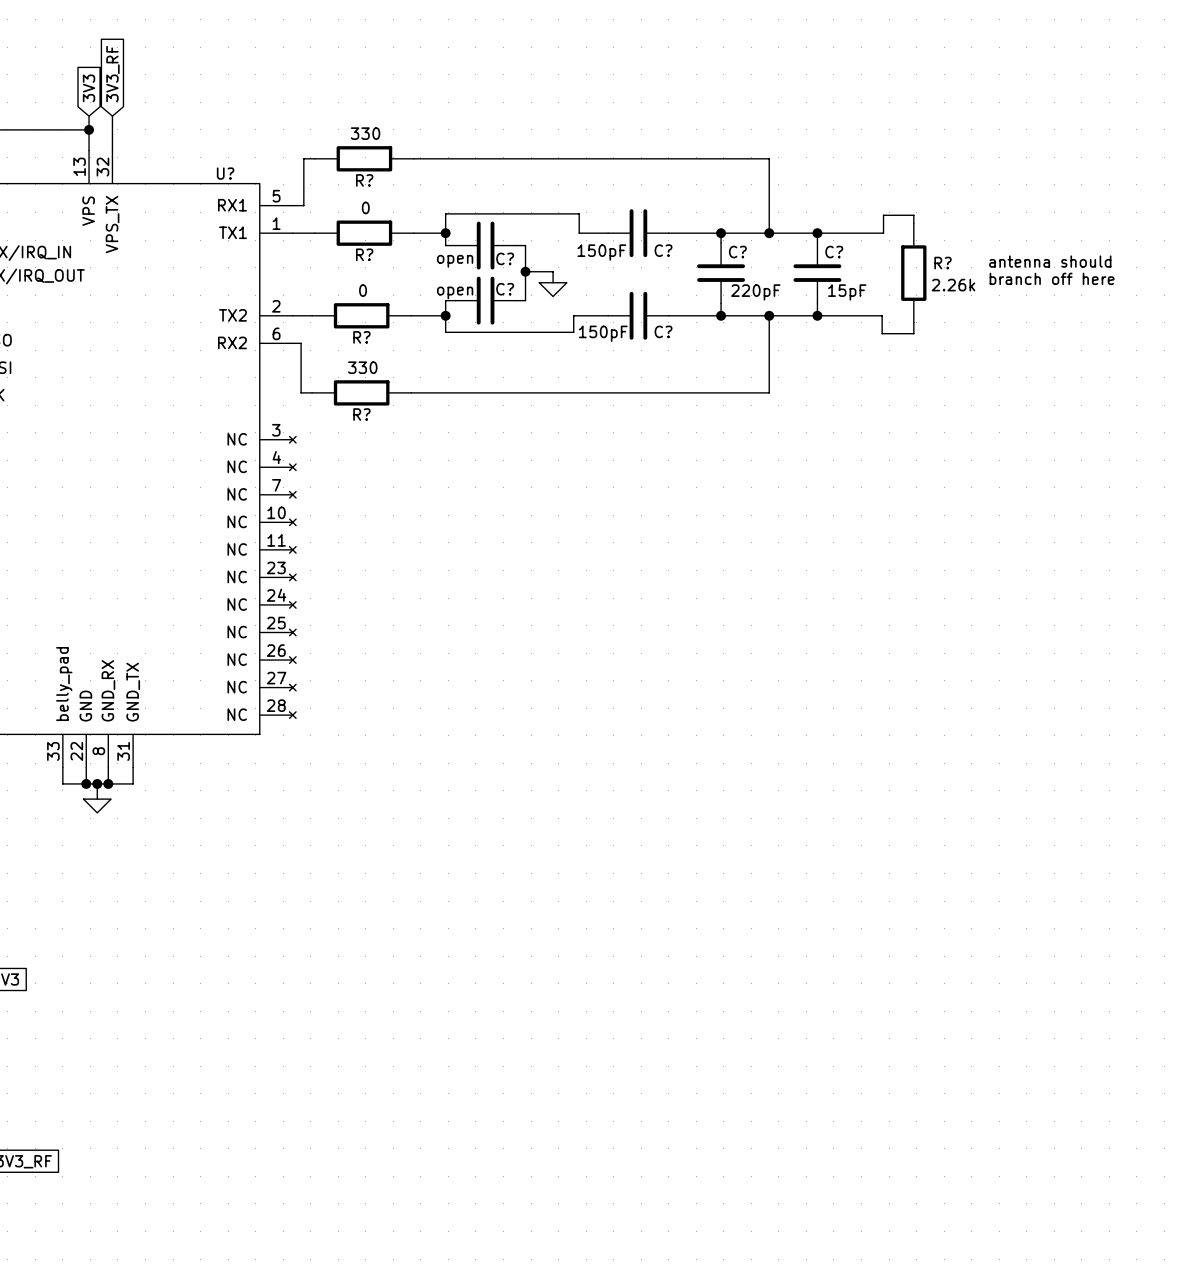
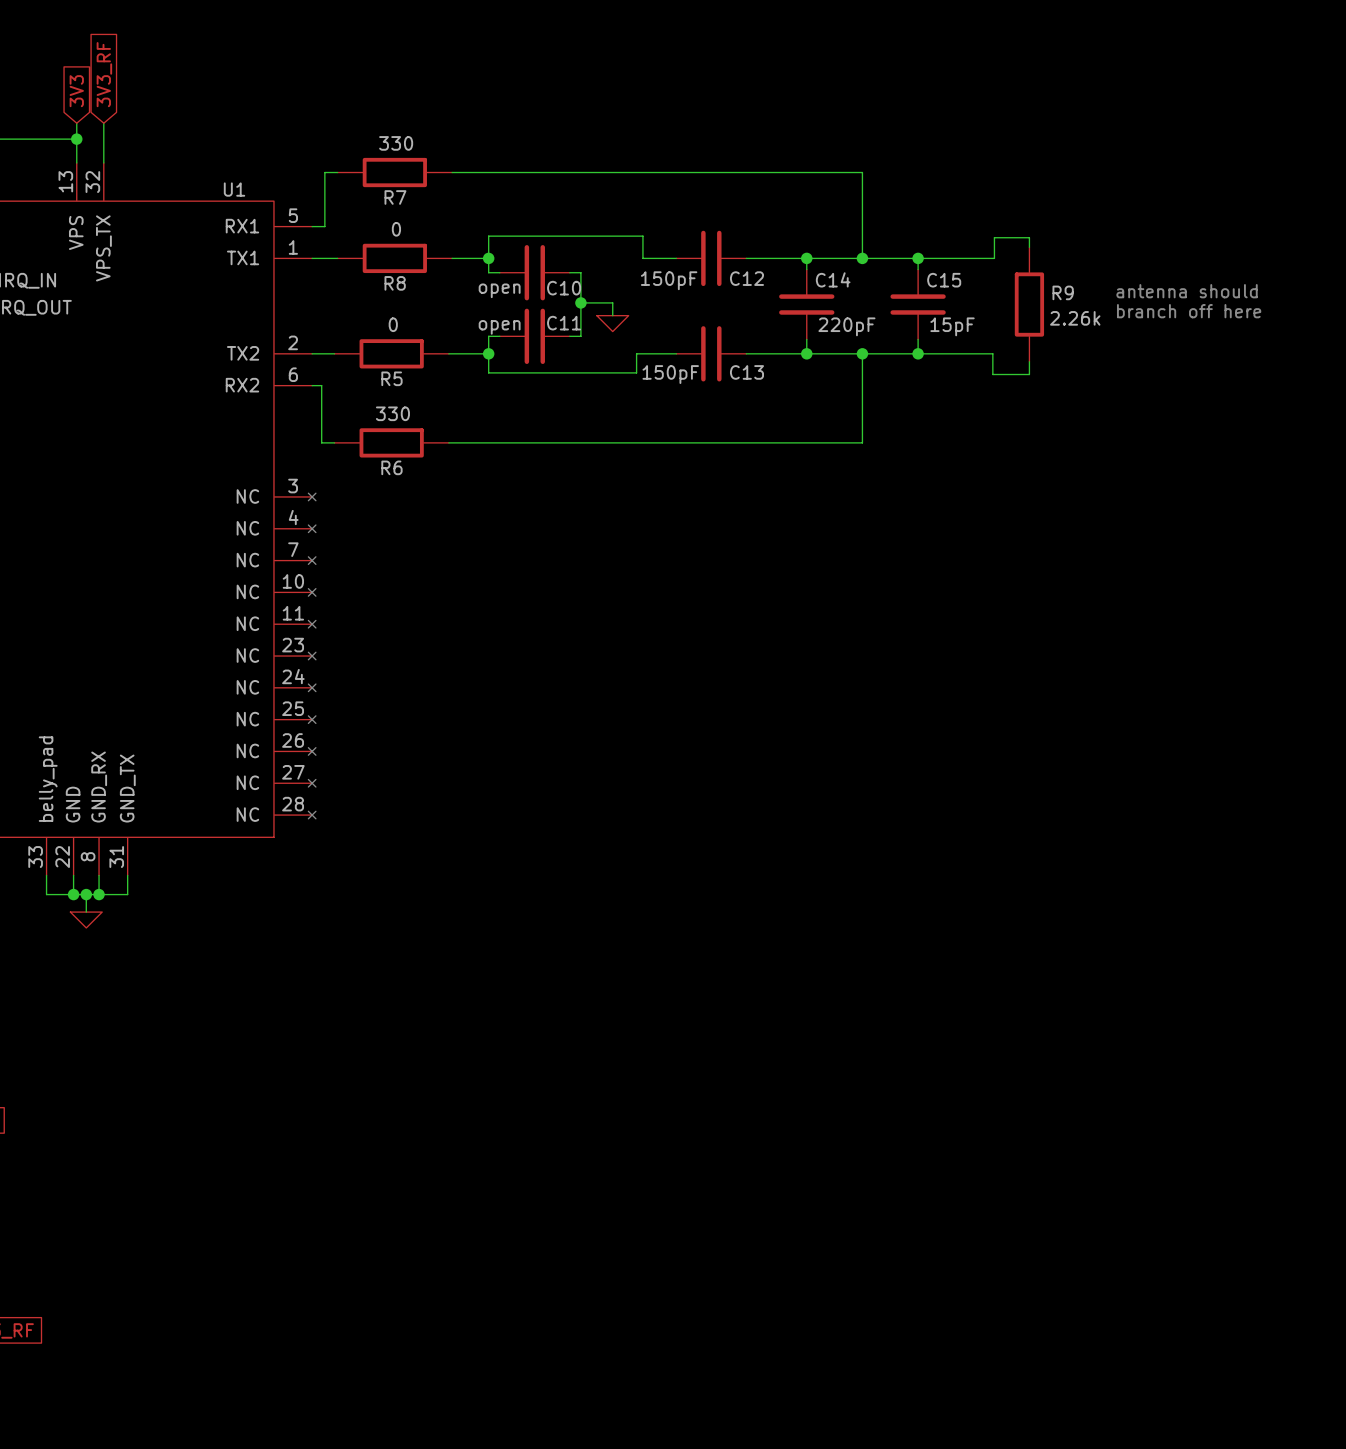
U? name: U? (225, 173) -> U1 (234, 189)
R? name: R? (364, 180) -> R7 (395, 197)
C? name: C? (663, 250) -> C12 (746, 278)
C? name: C? (737, 252) -> C14 (833, 279)
C? name: C? (834, 252) -> C15 (944, 280)
R? name: R? (364, 254) -> R8 (395, 283)
C? name: C? (505, 258) -> C10 (564, 288)
R? name: R? (943, 263) -> R9 (1063, 292)
C? name: C? (505, 289) -> C11 (564, 323)
C? name: C? (663, 331) -> C13 (746, 372)
R? name: R? (361, 337) -> R5 (391, 378)
R? name: R? (361, 414) -> R6 (391, 467)

